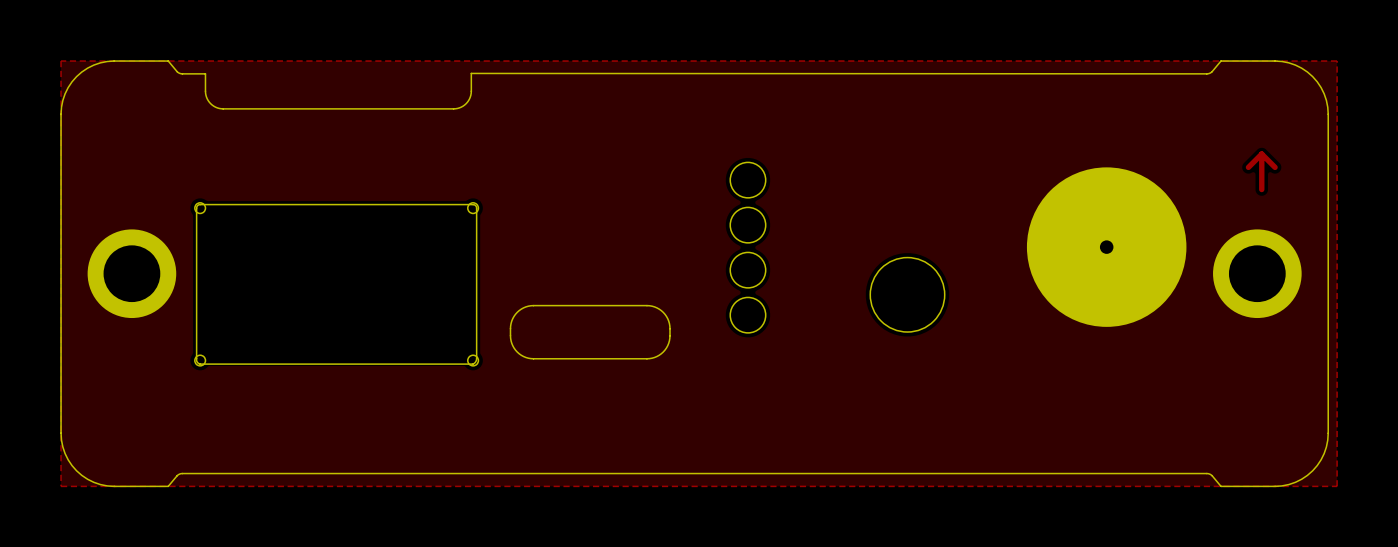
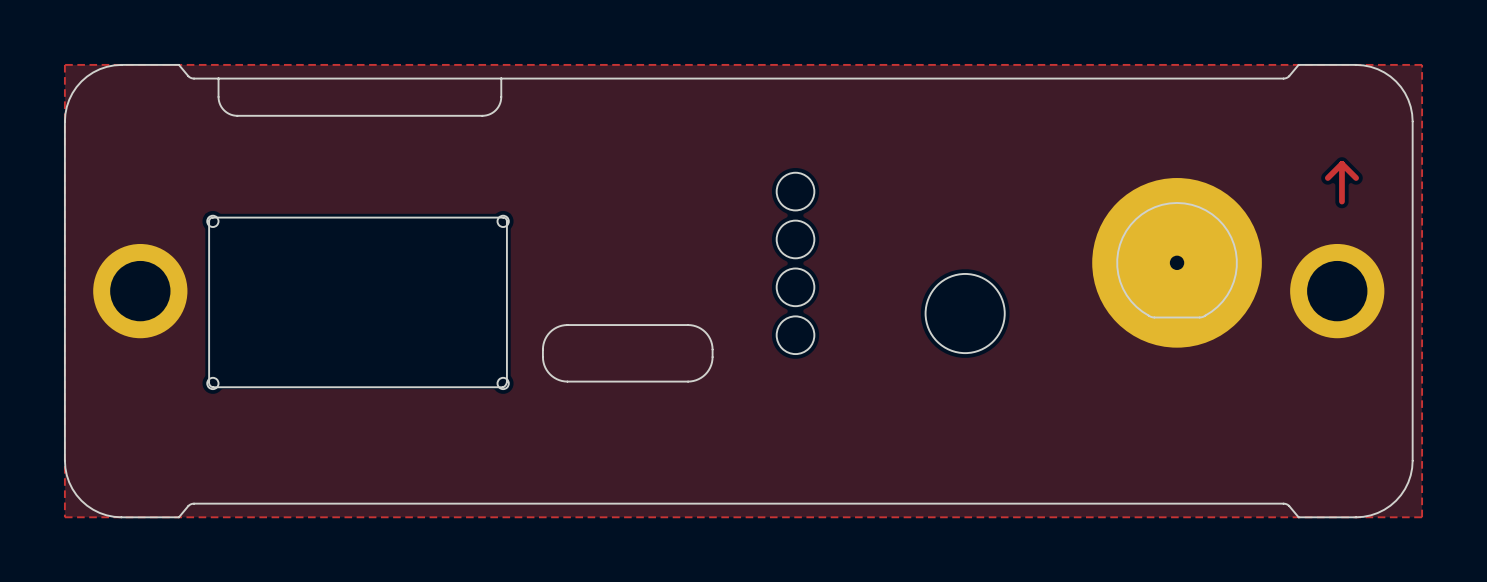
part footprint: [60, 60, 1329, 487] -> [64, 64, 1414, 518]
board edge: none -> (218, 78) (220, 105) (227, 112) (237, 115) (484, 115) (492, 112) (499, 105) (501, 78)

